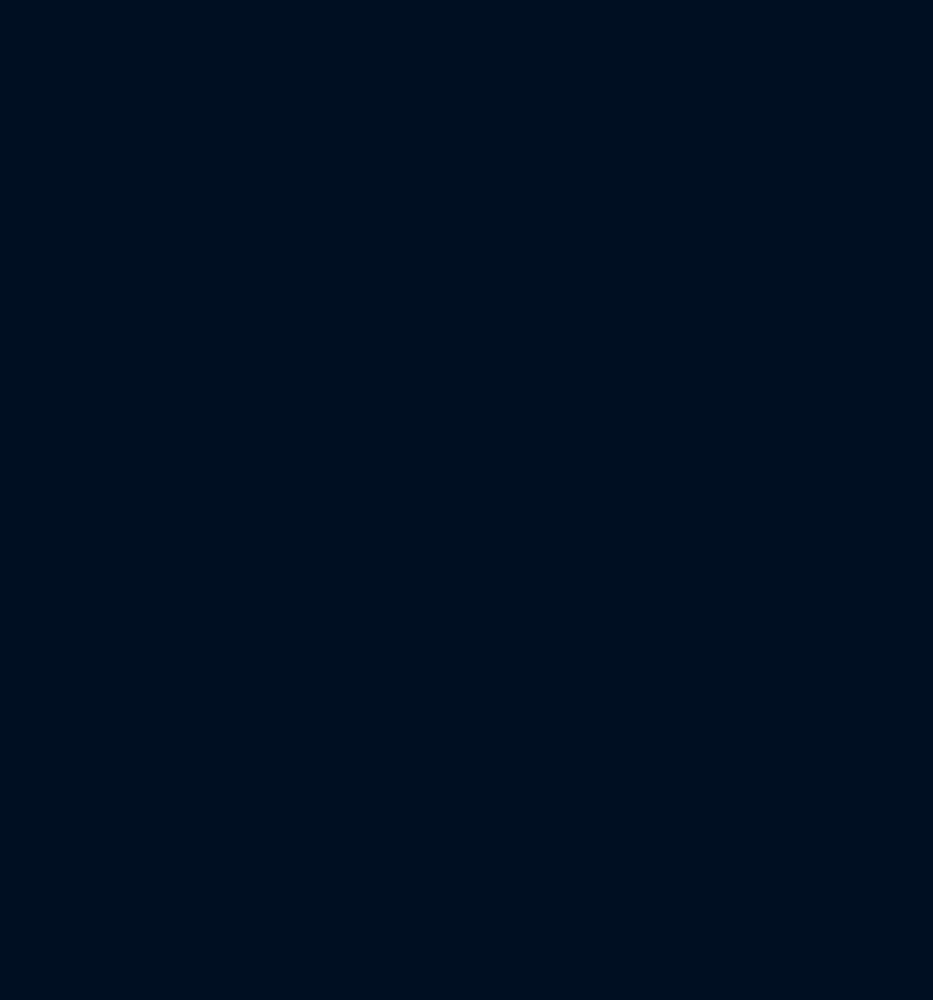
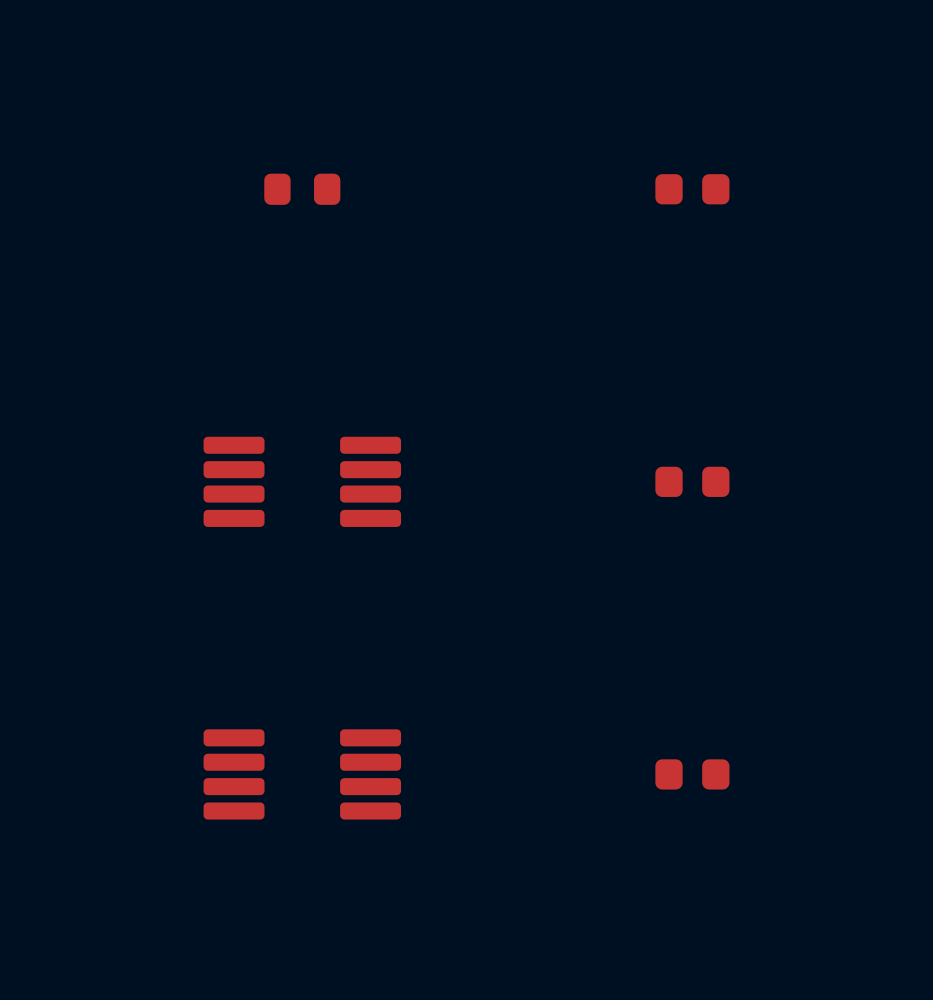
part: none -> (302, 189)
part: none -> (692, 189)
part: none -> (302, 481)
part: none -> (692, 481)
part: none -> (302, 774)
part: none -> (692, 774)

